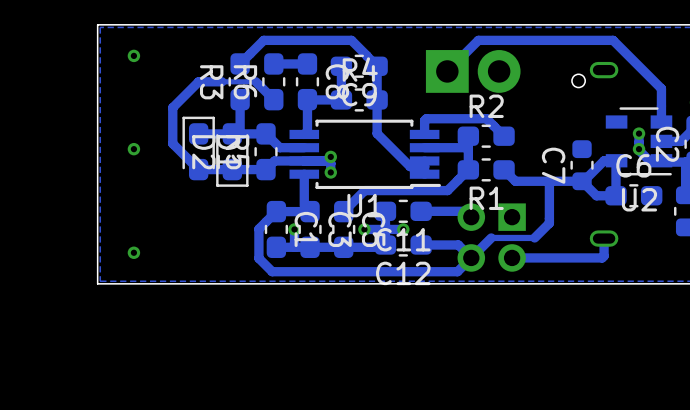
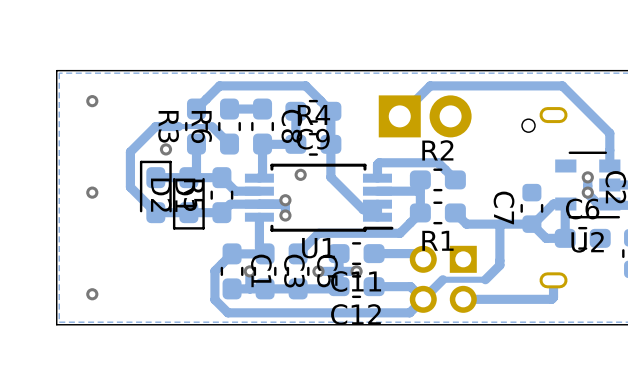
via: none -> (165, 149)
via: none -> (300, 174)

